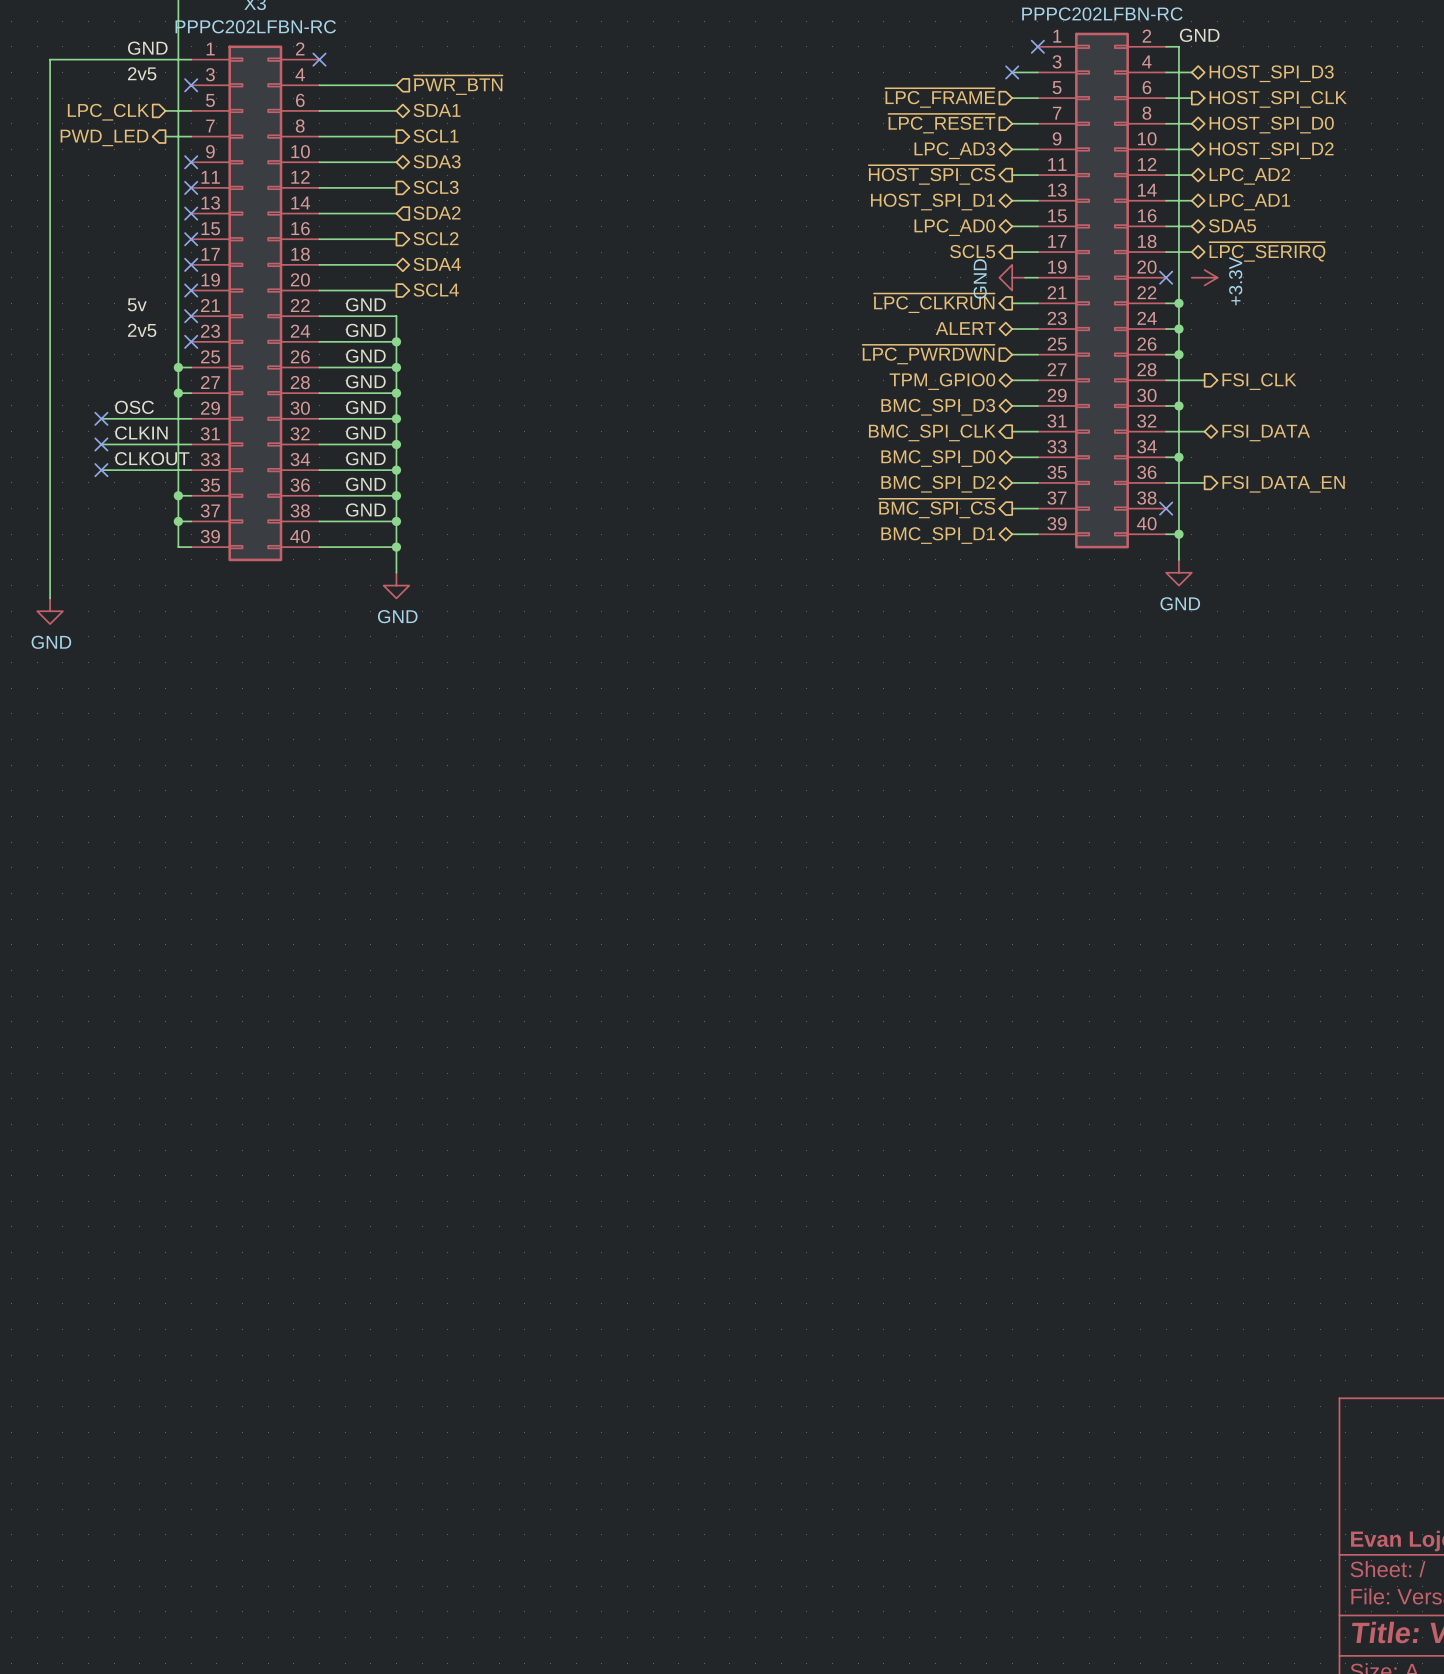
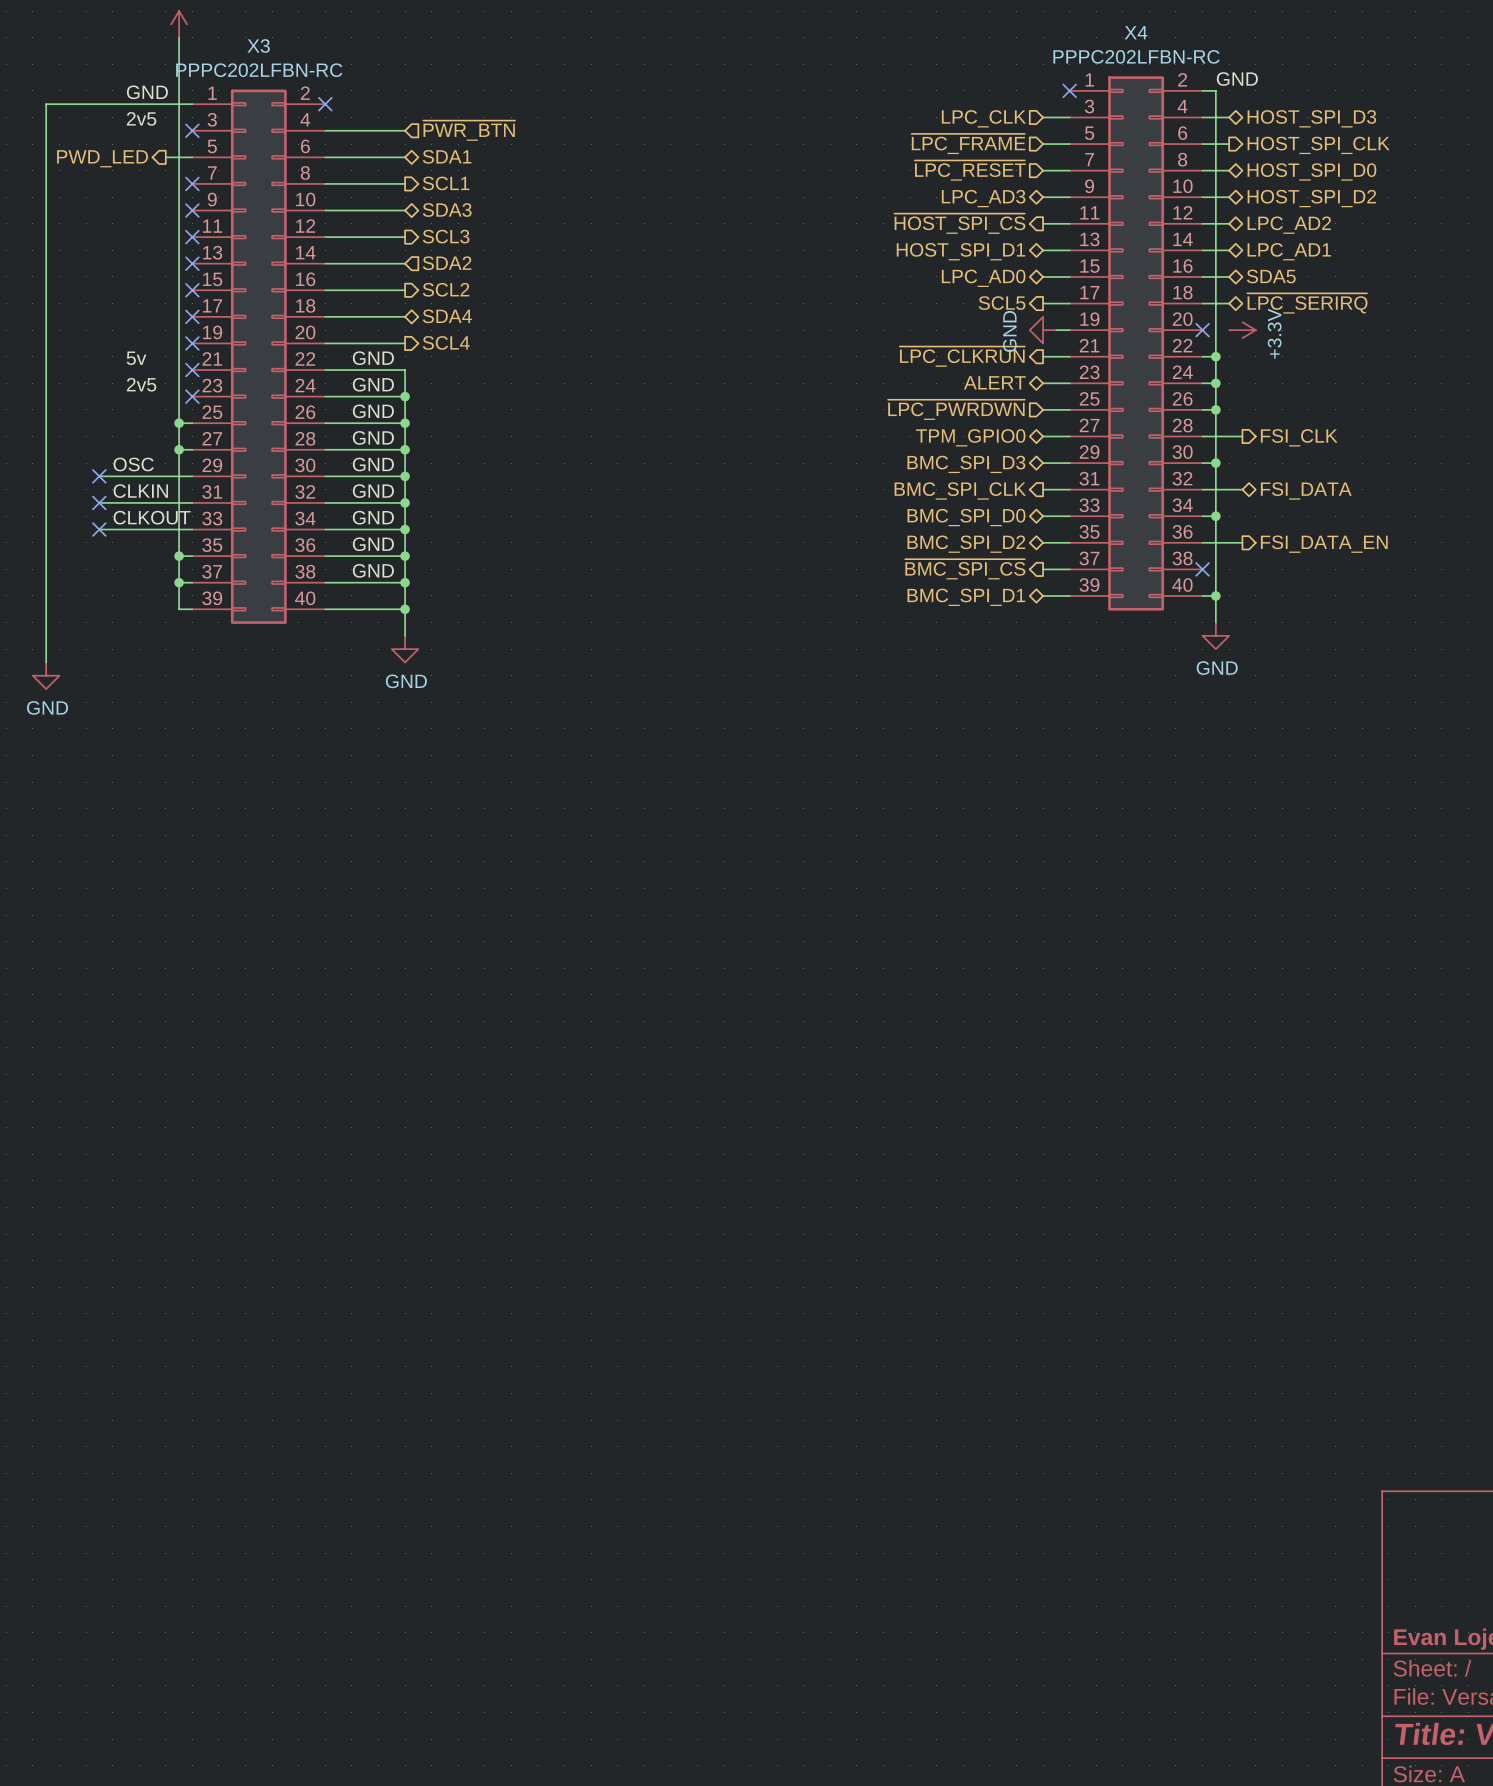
no-connect mark: (1012, 72) -> none
hierarchical label: none -> LPC_CLK (983, 118)
hierarchical label shape: input (108, 112) -> output (102, 158)
hierarchical label: LPC_CLK (108, 112) -> PWD_LED (102, 158)
wire: (165, 136) (191, 136) -> none
no-connect mark: none -> (192, 183)
hierarchical label: PWD_LED (104, 137) -> none

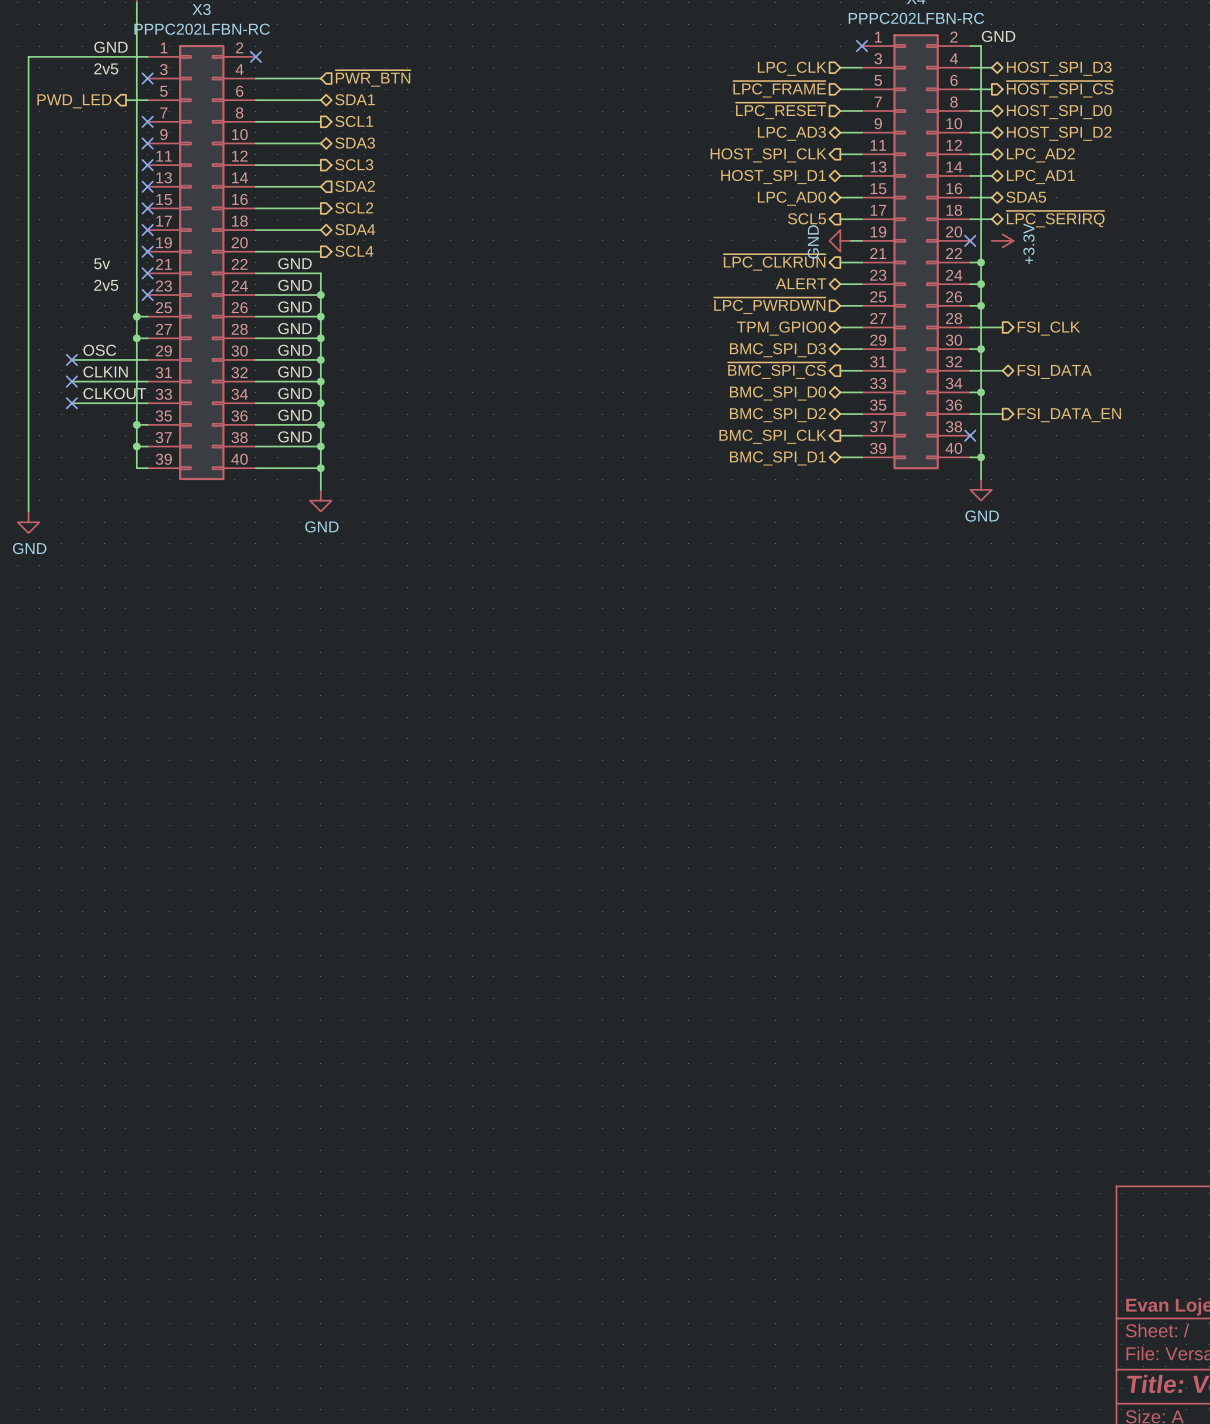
hierarchical label: HOST_SPI_CLK (1318, 145) -> ~{HOST_SPI_CS} (1060, 89)
hierarchical label: ~{HOST_SPI_CS} (959, 223) -> HOST_SPI_CLK (768, 155)
hierarchical label: BMC_SPI_CLK (960, 490) -> ~{BMC_SPI_CS} (776, 370)
hierarchical label: ~{BMC_SPI_CS} (965, 569) -> BMC_SPI_CLK (772, 436)

